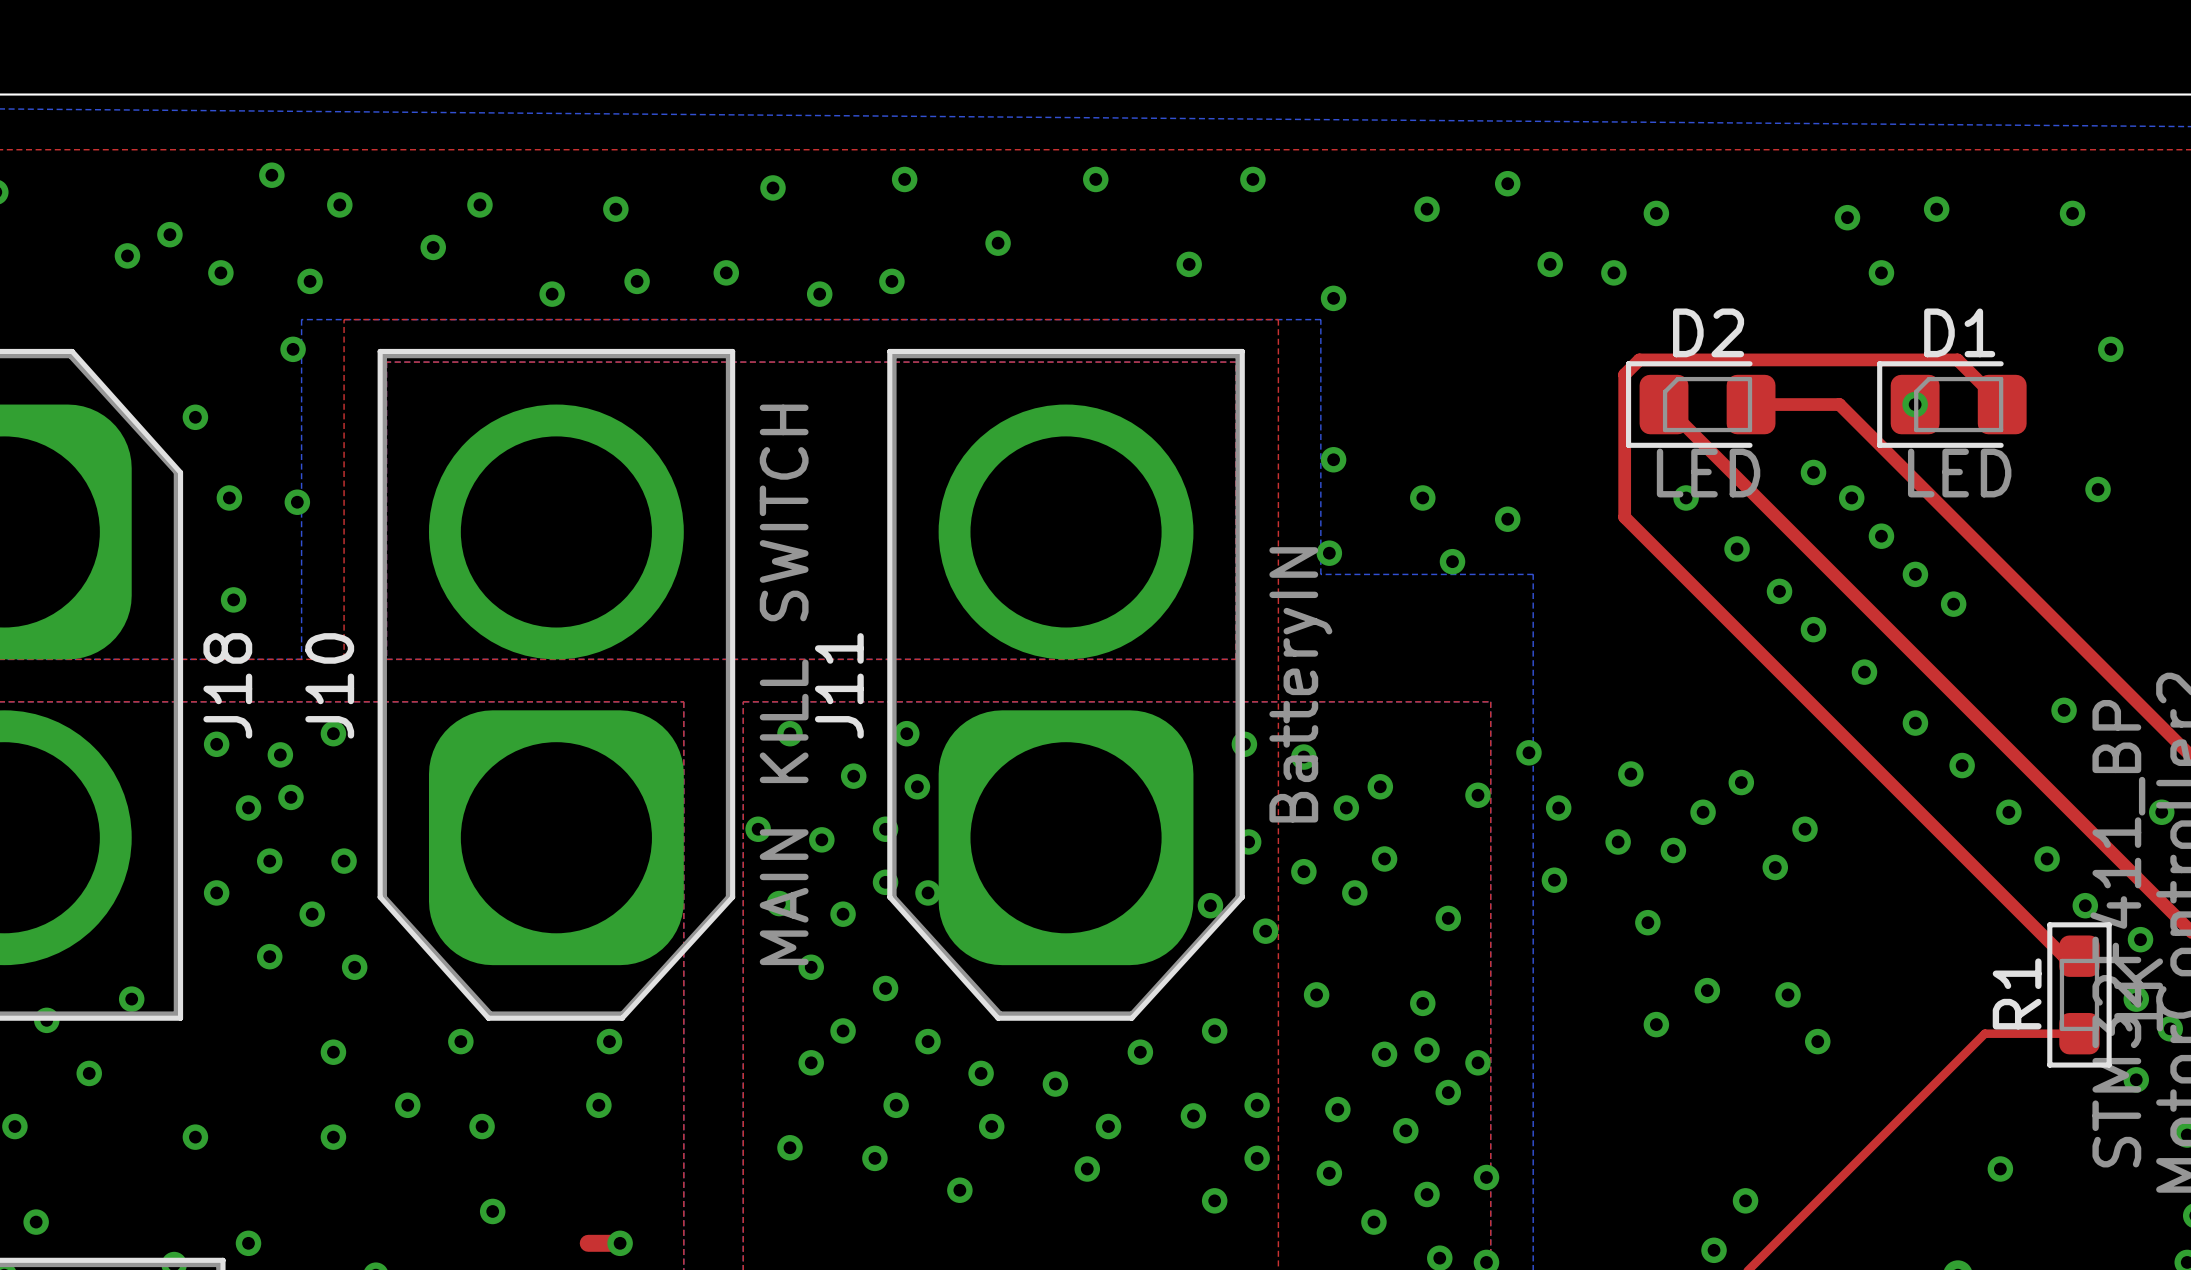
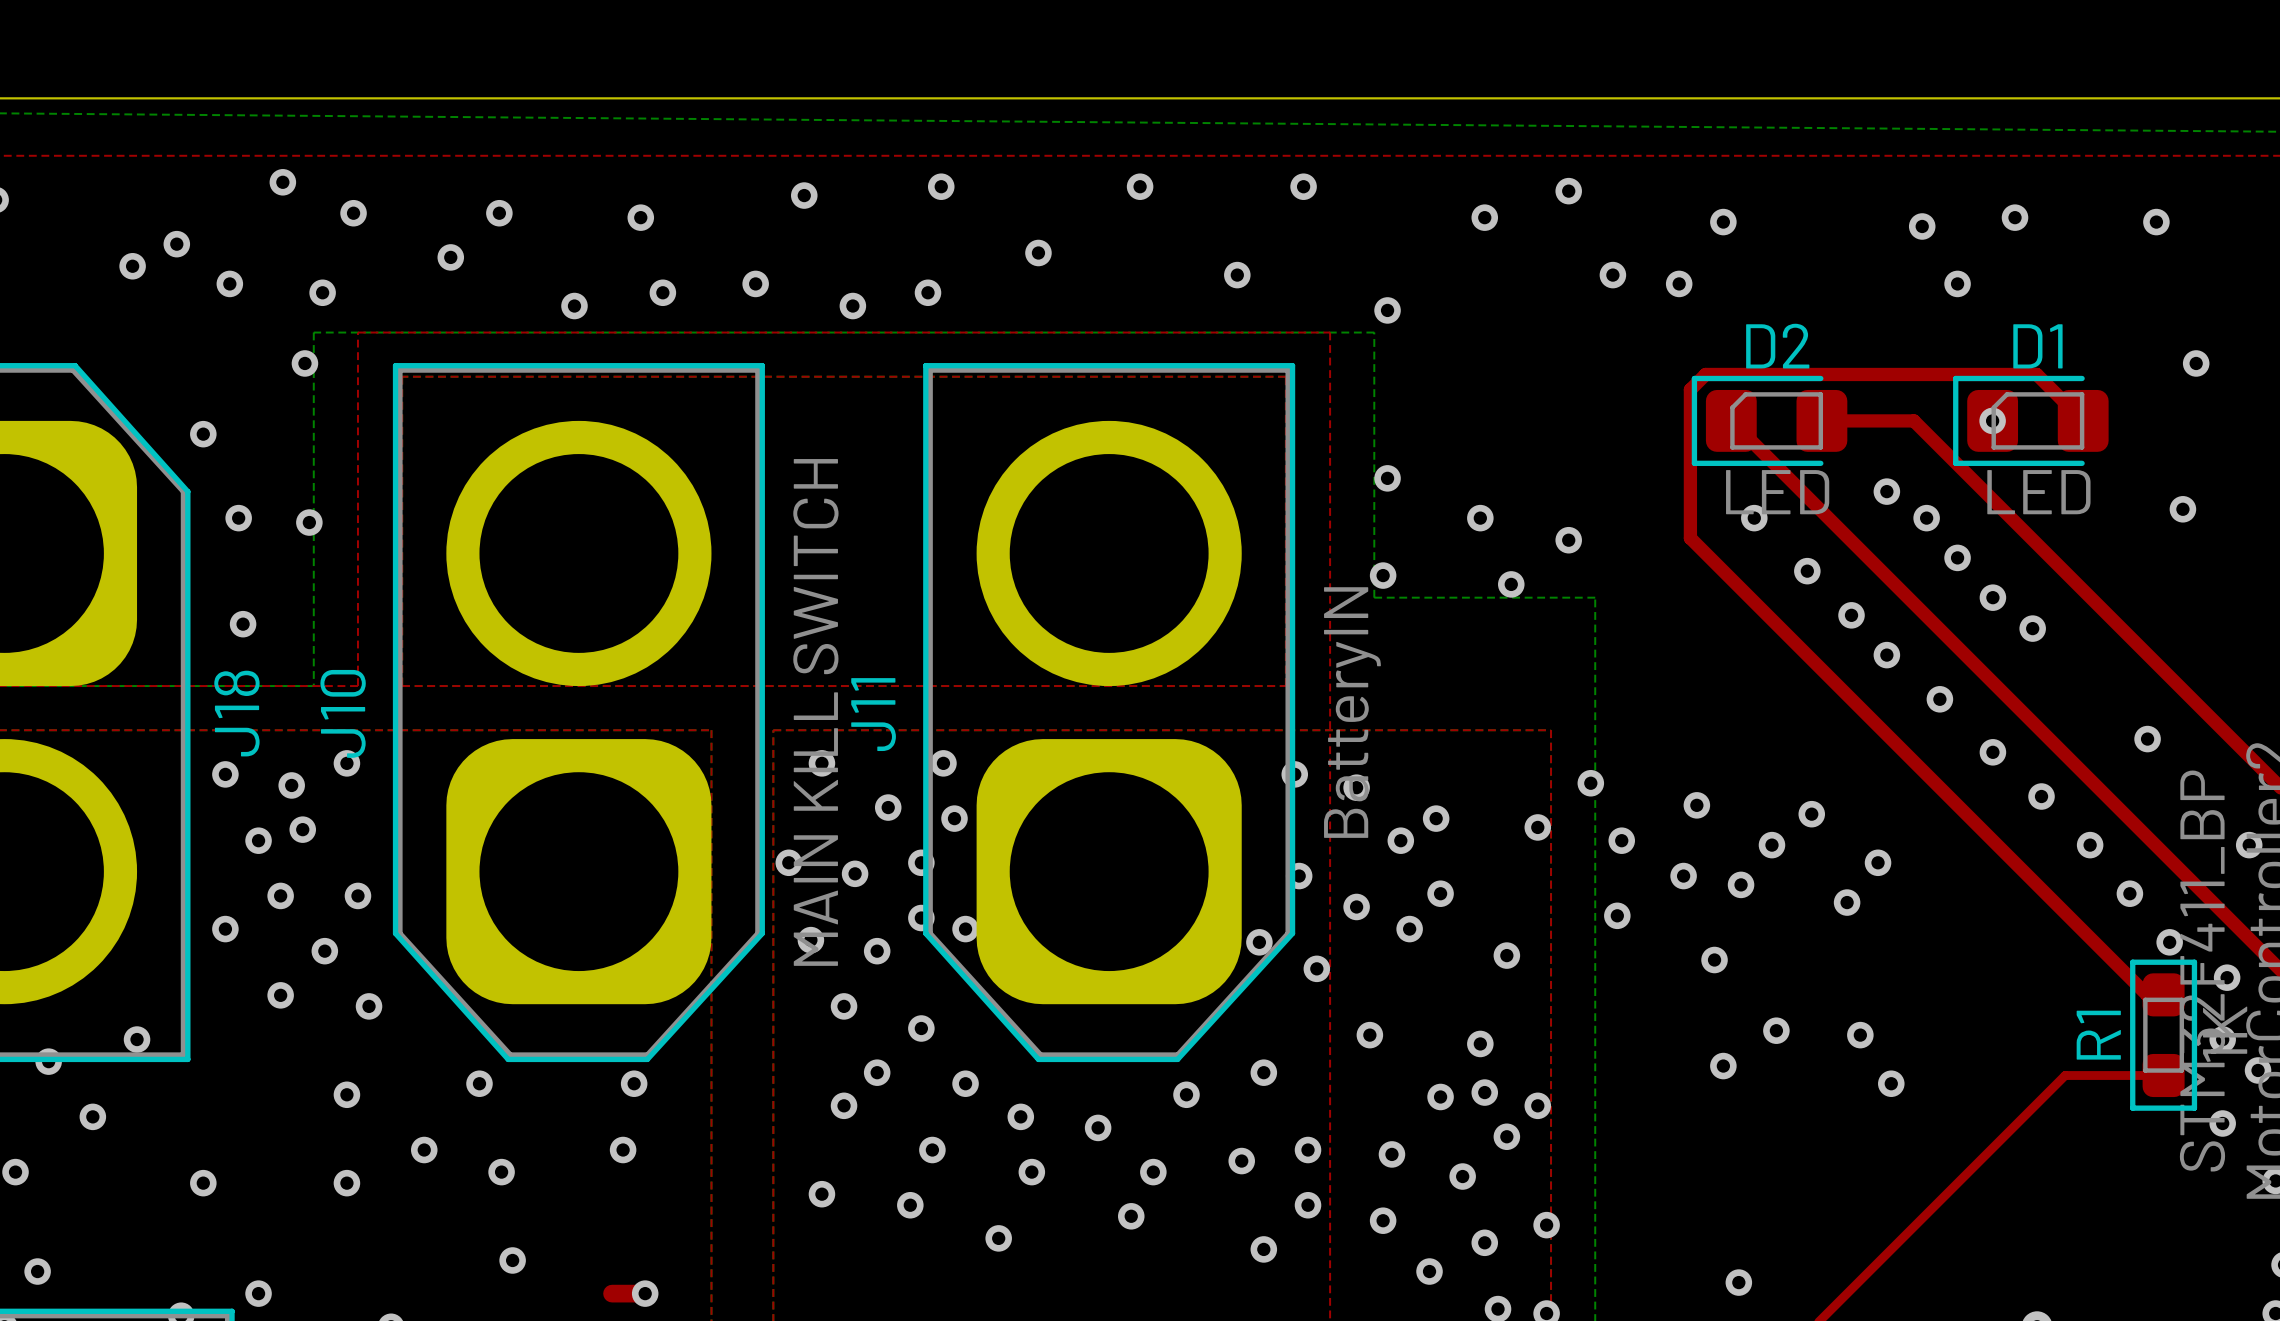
via: (2000, 1169) -> none
via: (1745, 1200) -> none
via: none -> (1738, 1282)
via: (1714, 1250) -> none

